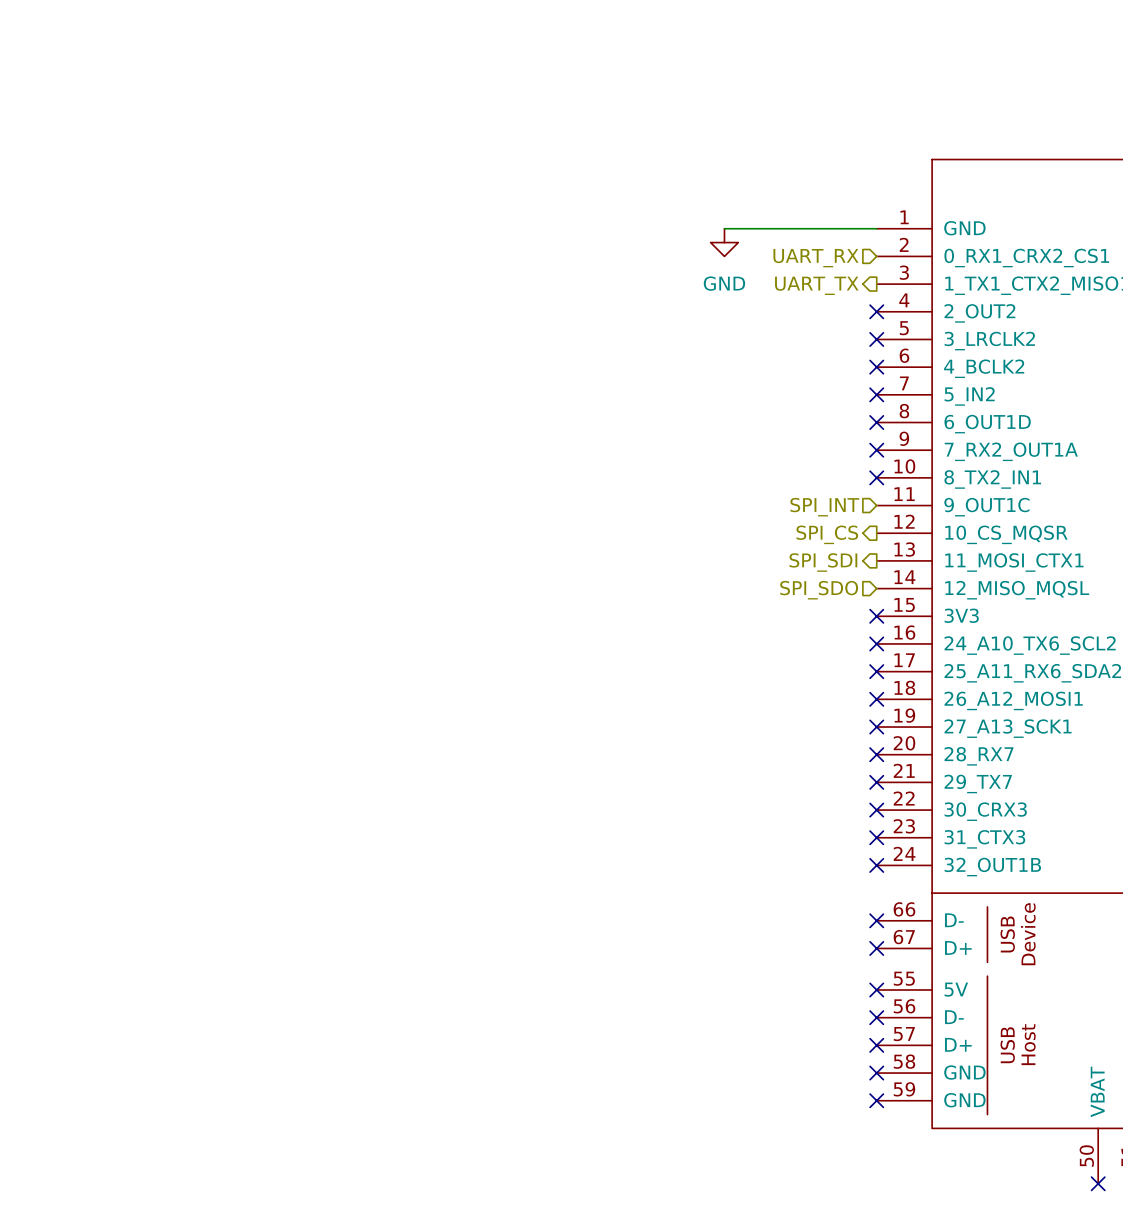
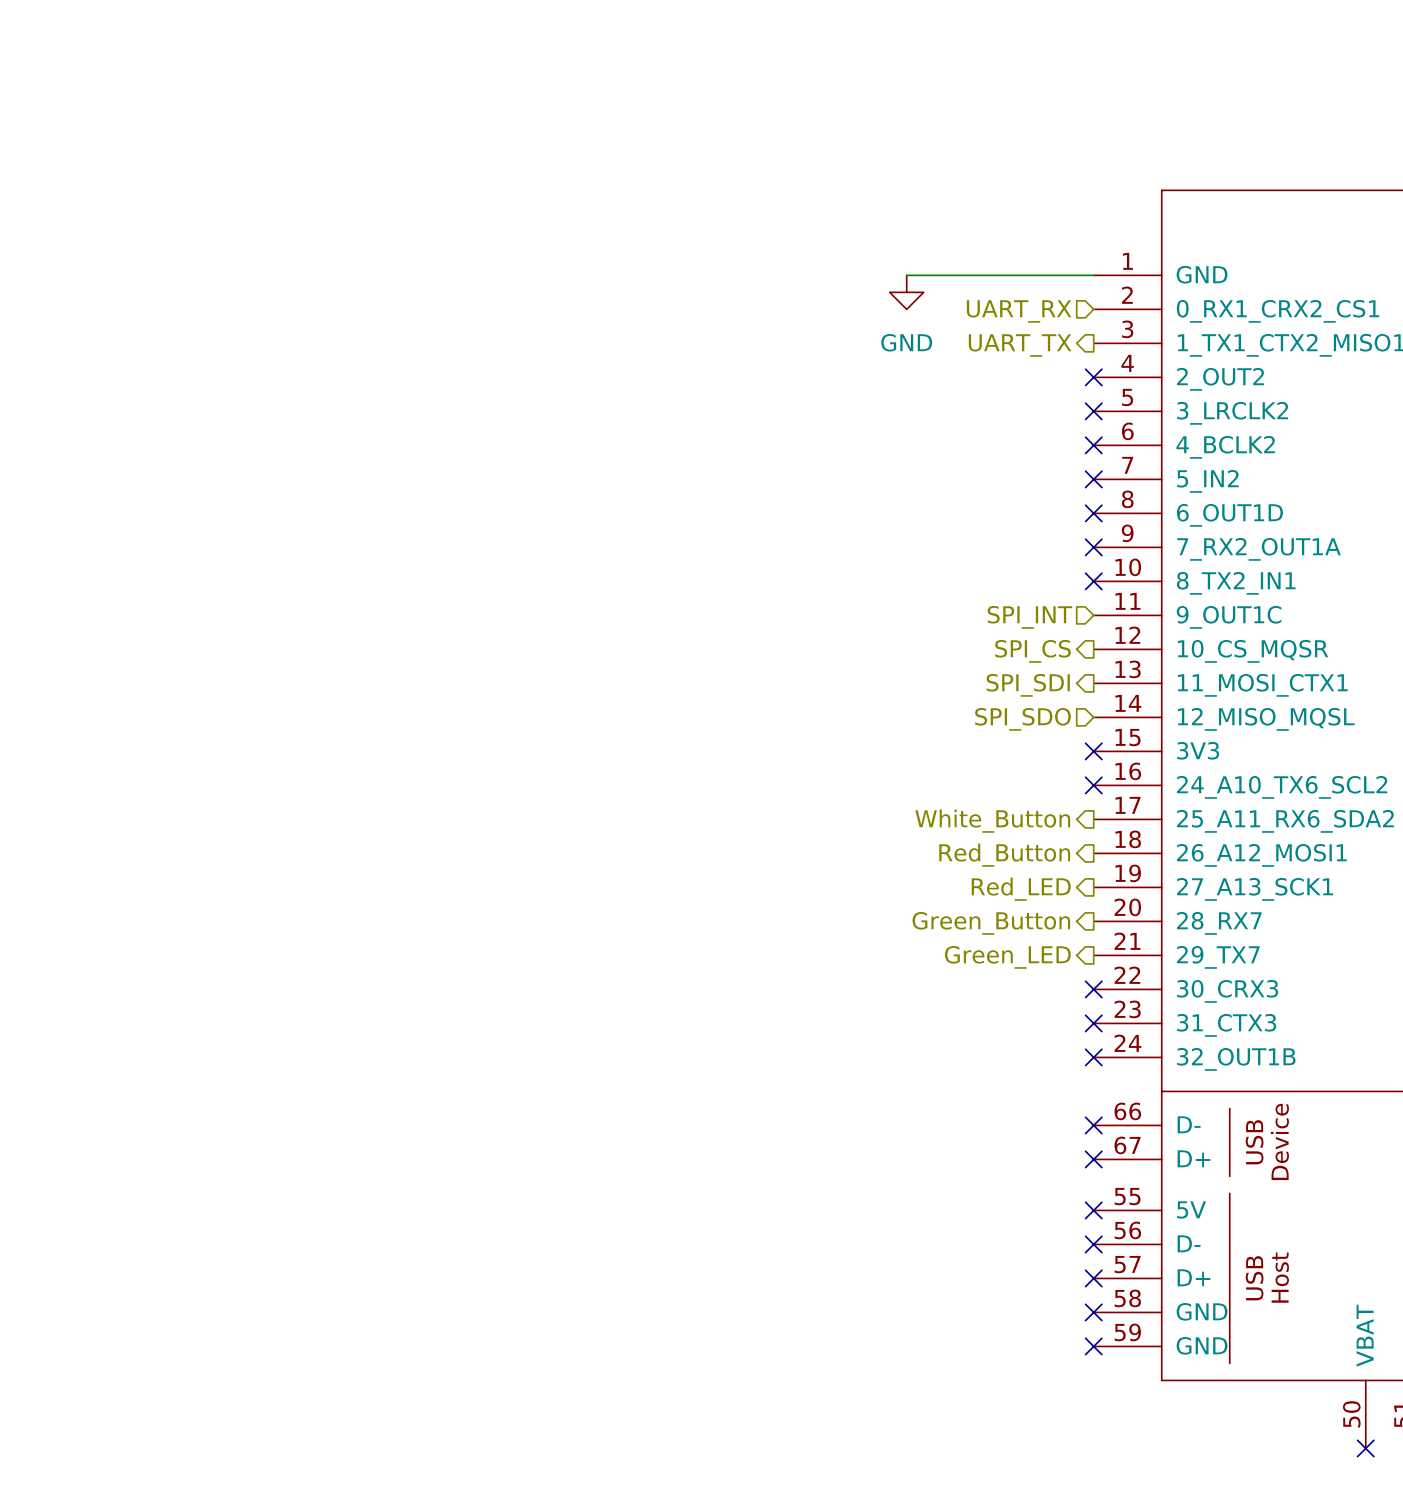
no-connect mark: (876, 671) -> none
hierarchical label: none -> White_Button (992, 821)
no-connect mark: (876, 699) -> none
hierarchical label: none -> Red_Button (1004, 855)
no-connect mark: (876, 727) -> none
hierarchical label: none -> Red_LED (1021, 889)
no-connect mark: (876, 754) -> none
hierarchical label: none -> Green_Button (991, 923)
no-connect mark: (876, 782) -> none
hierarchical label: none -> Green_LED (1007, 957)

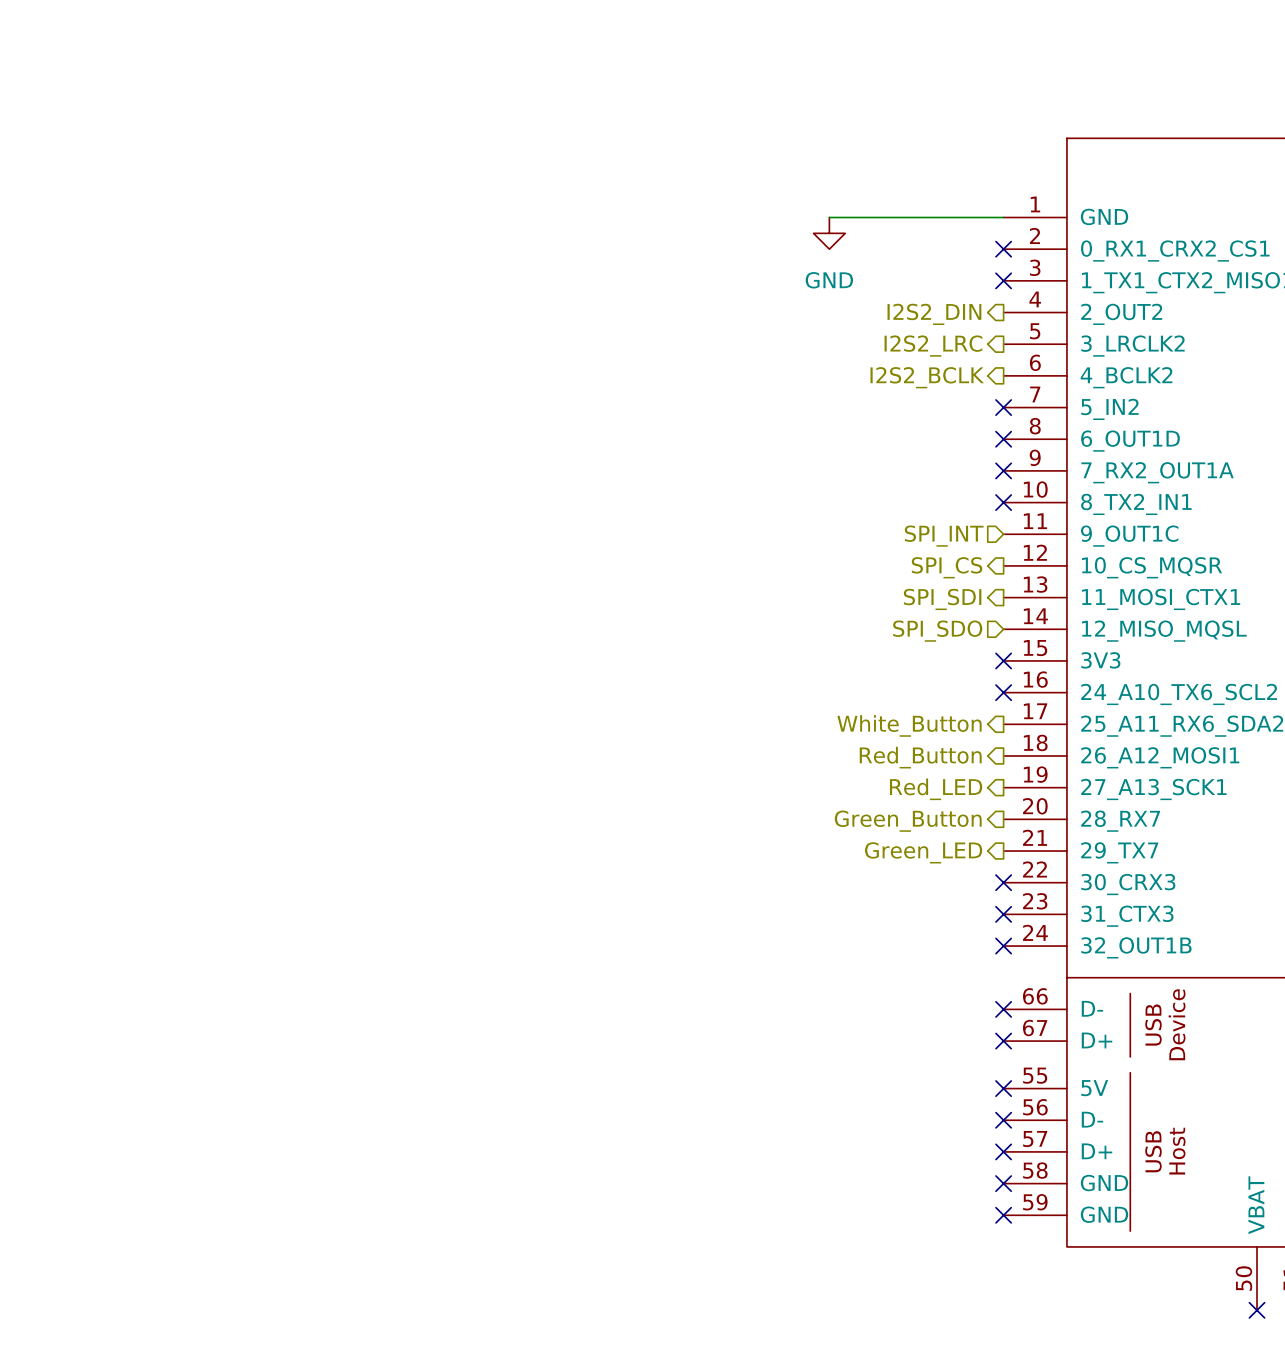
no-connect mark: none -> (1003, 249)
hierarchical label: UART_RX (1019, 311) -> none
no-connect mark: none -> (1003, 280)
hierarchical label: UART_TX (1020, 345) -> none
no-connect mark: (1093, 377) -> none
hierarchical label: none -> I2S2_DIN (934, 314)
no-connect mark: (1093, 411) -> none
hierarchical label: none -> I2S2_LRC (933, 346)
no-connect mark: (1093, 445) -> none
hierarchical label: none -> I2S2_BCLK (927, 377)

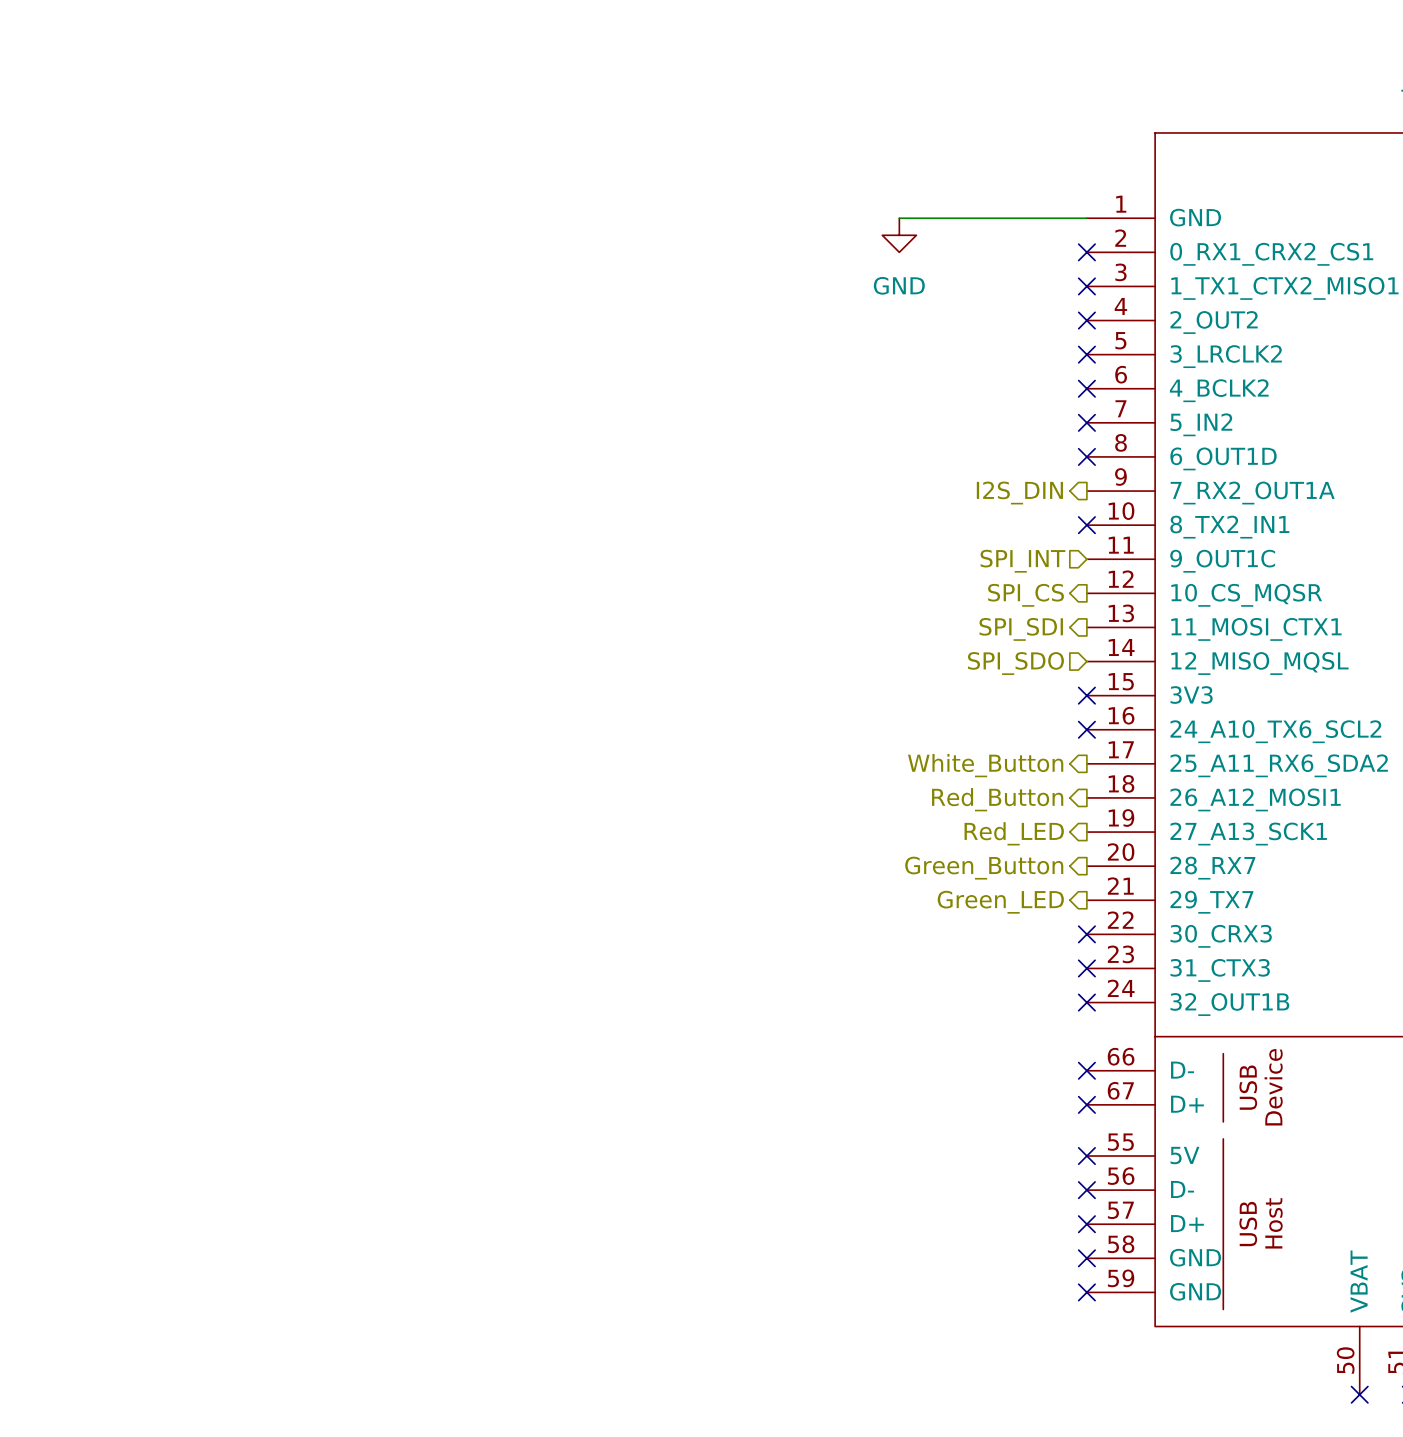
no-connect mark: none -> (1086, 320)
hierarchical label: I2S2_DIN (934, 314) -> none
no-connect mark: none -> (1086, 354)
hierarchical label: I2S2_LRC (933, 346) -> none
no-connect mark: none -> (1086, 388)
hierarchical label: I2S2_BCLK (927, 377) -> none
no-connect mark: (1003, 470) -> none
hierarchical label: none -> I2S_DIN (1019, 493)

